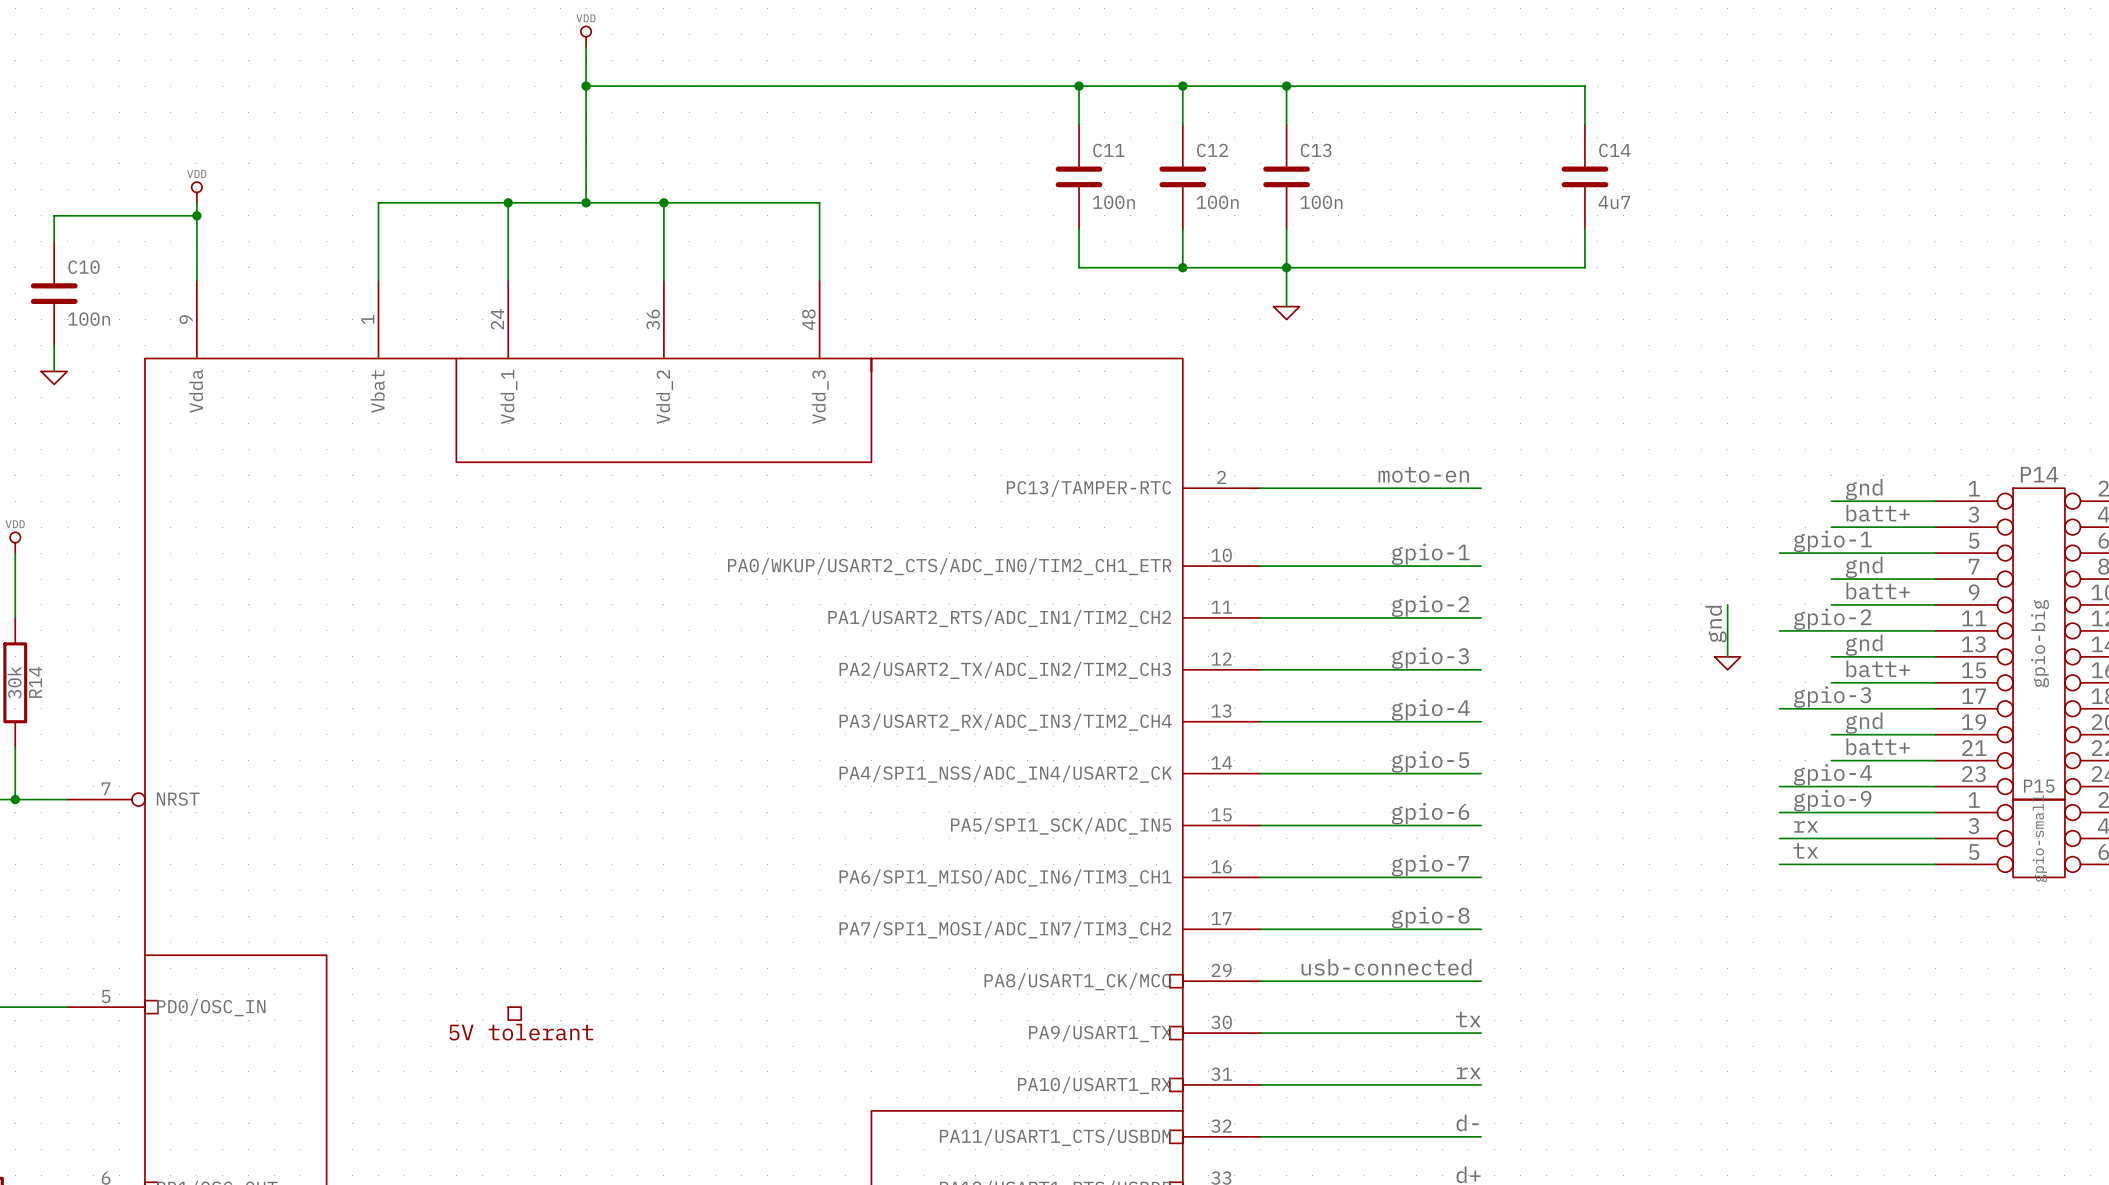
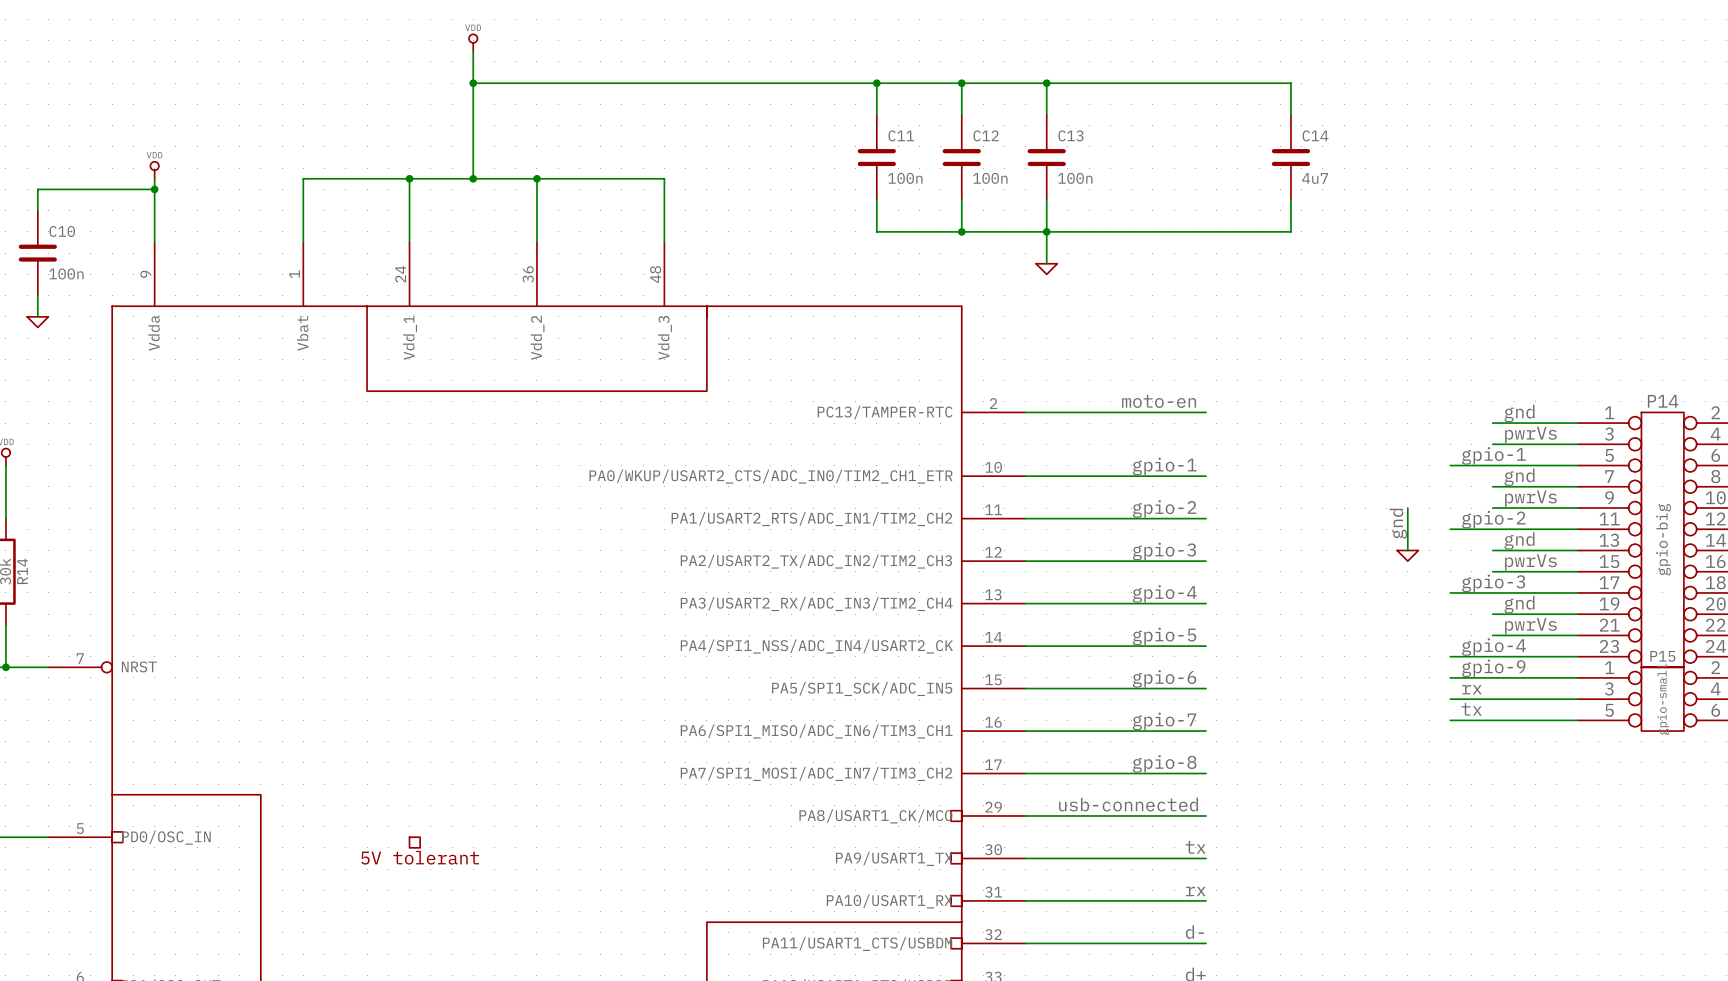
label: batt+ (1878, 513) -> pwrVs (1530, 435)
label: batt+ (1878, 591) -> pwrVs (1530, 498)
label: batt+ (1878, 668) -> pwrVs (1530, 562)
label: batt+ (1878, 746) -> pwrVs (1530, 626)

